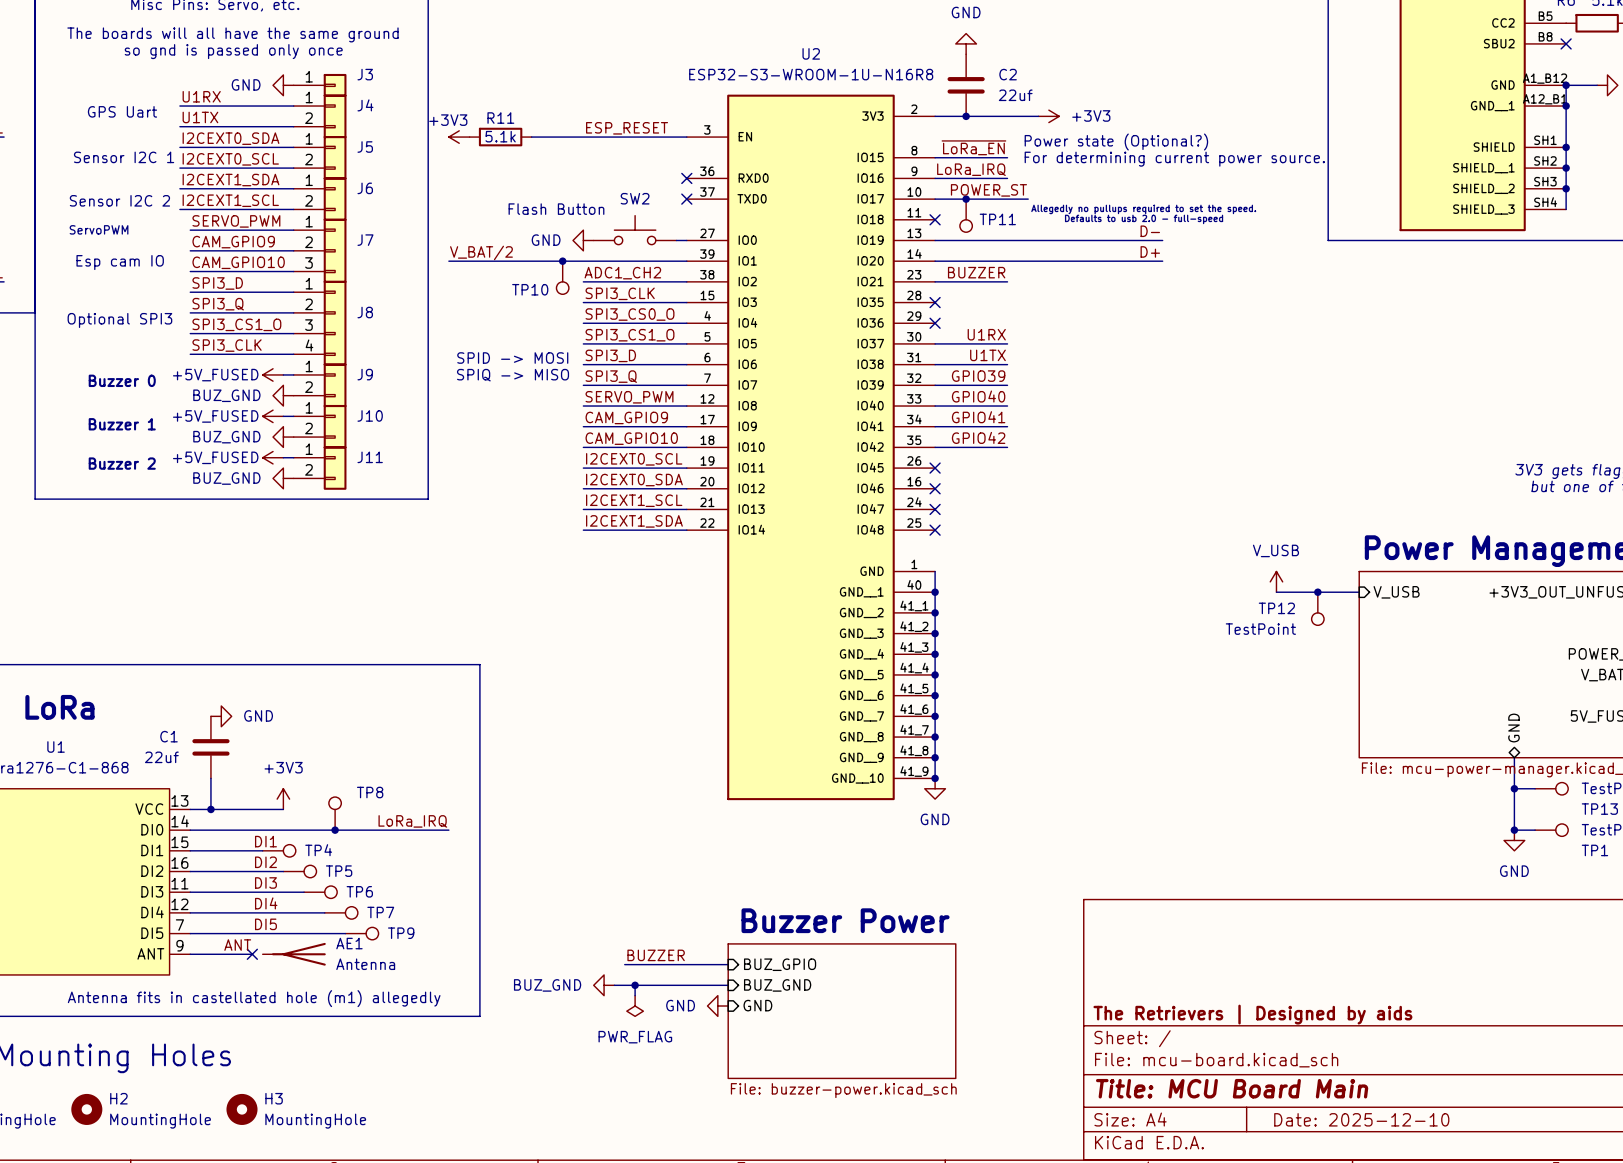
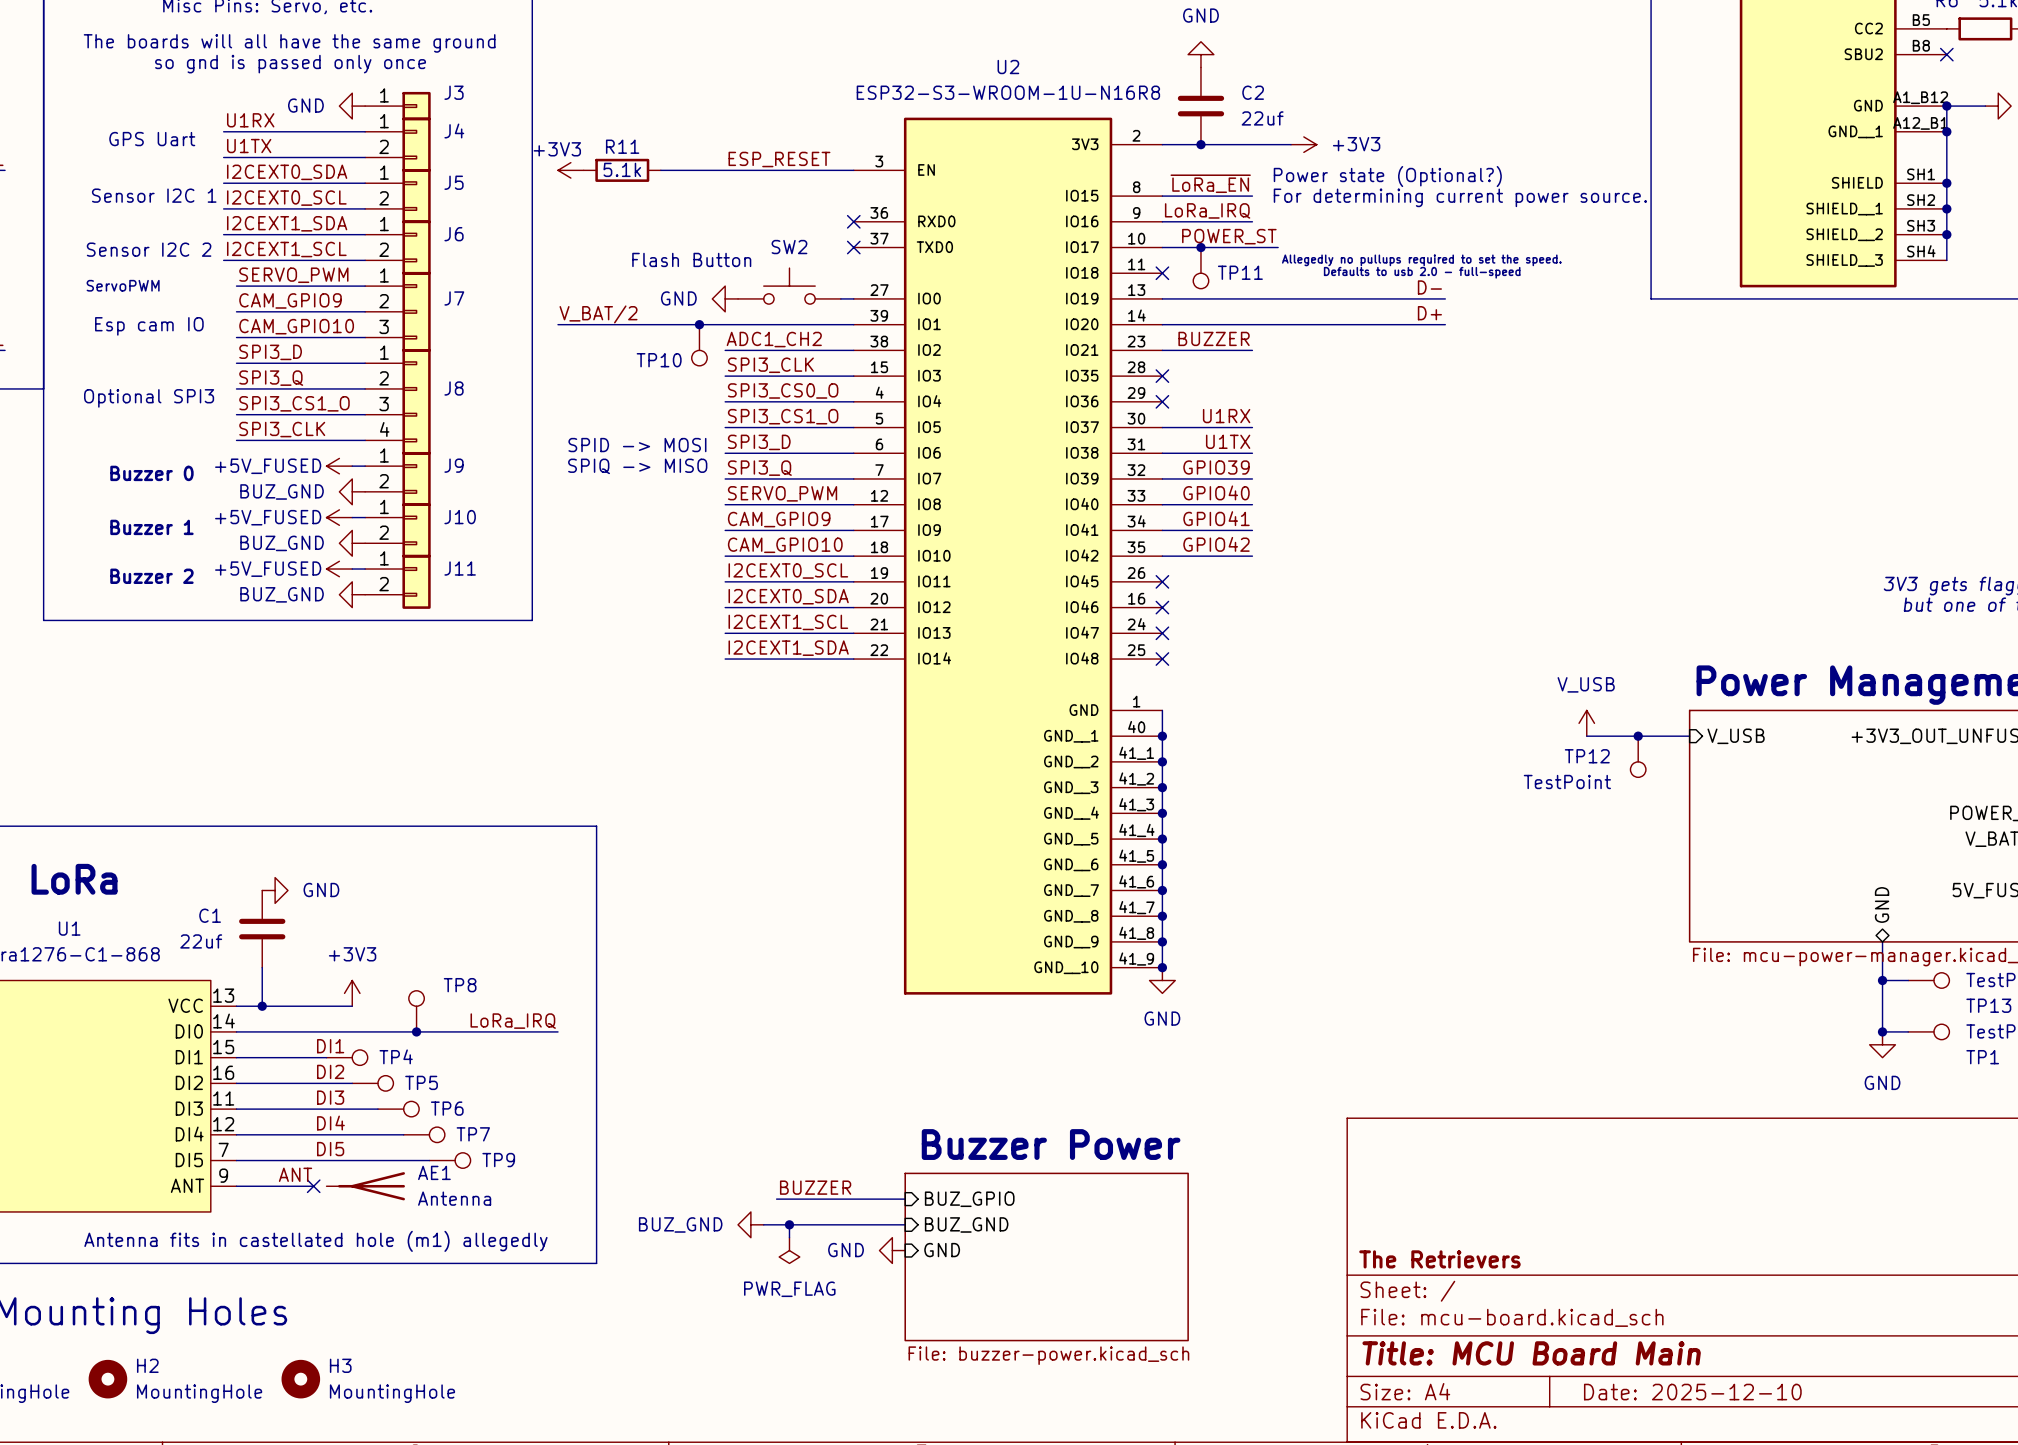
title block: The Retrievers | Designed by aids (1252, 1014) -> The Retrievers (1439, 1259)

